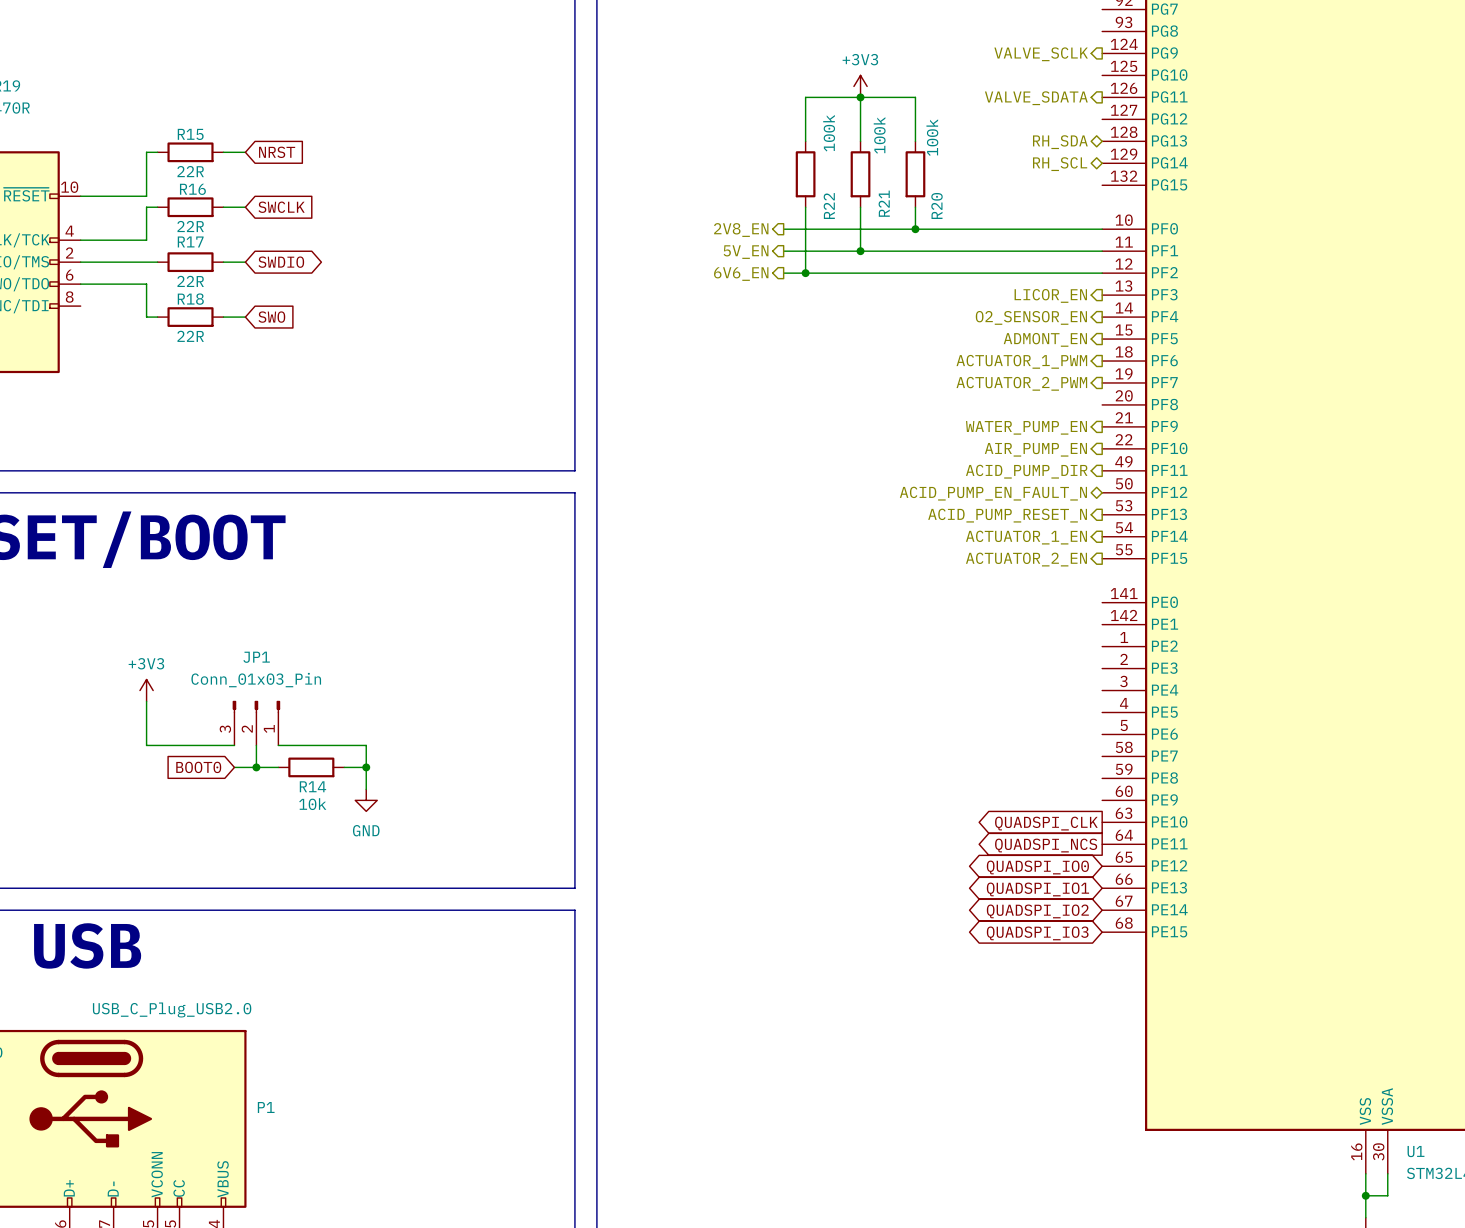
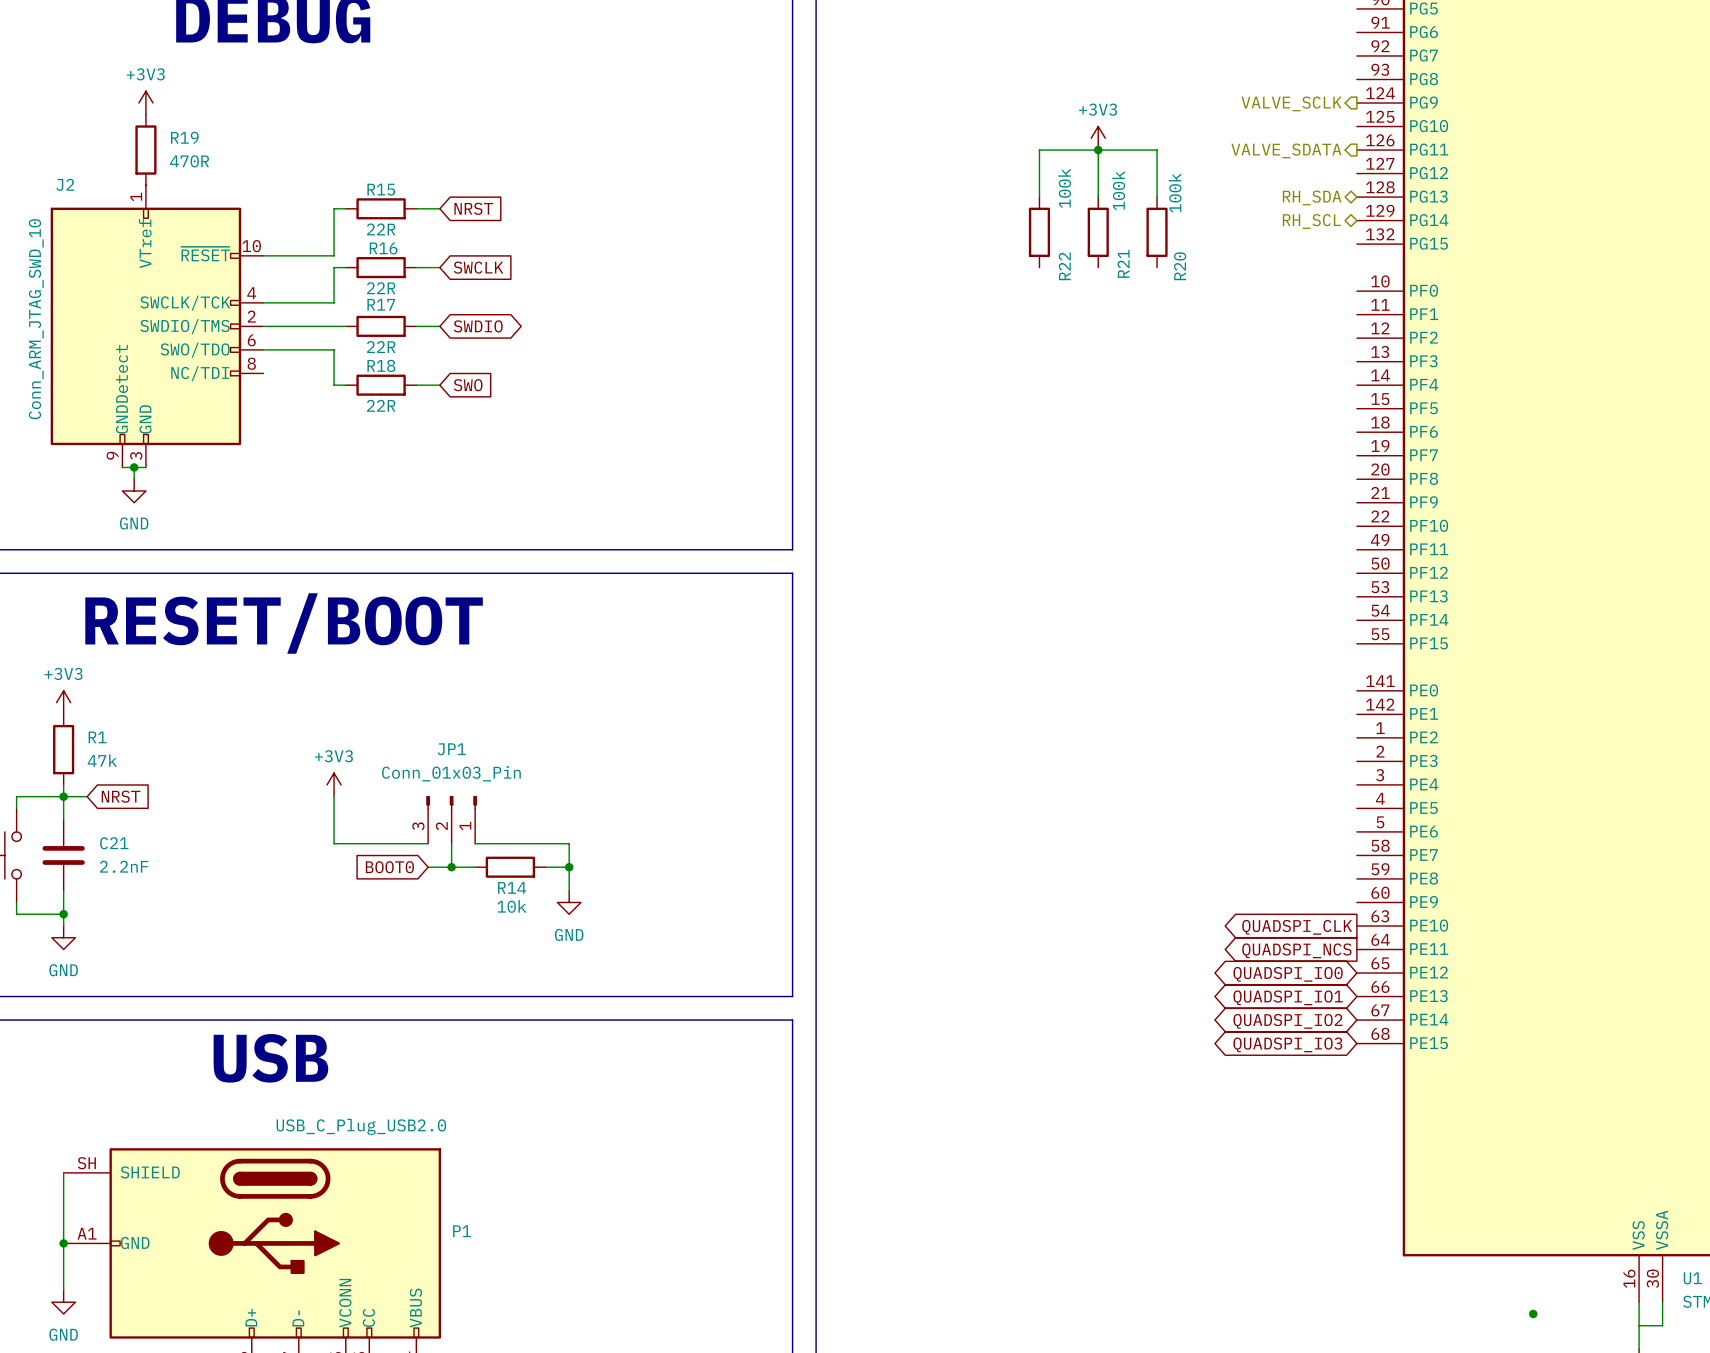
wire: (805, 207) (805, 273) -> none
wire: (860, 207) (860, 251) -> none
wire: (915, 207) (915, 229) -> none
wire: (783, 229) (1102, 229) -> none
junction: (915, 229) -> none
hierarchical label: 2V8_EN (741, 230) -> none
wire: (783, 251) (1102, 251) -> none
junction: (860, 251) -> none
hierarchical label: 5V_EN (746, 252) -> none
wire: (783, 273) (1102, 273) -> none
junction: (805, 273) -> none
hierarchical label: 6V6_EN (741, 274) -> none
hierarchical label: LICOR_EN (1050, 295) -> none
hierarchical label: O2_SENSOR_EN (1031, 317) -> none
hierarchical label: ADMONT_EN (1045, 339) -> none
hierarchical label: ACTUATOR_1_PWM (1021, 361) -> none
hierarchical label: ACTUATOR_2_PWM (1021, 383) -> none
hierarchical label: WATER_PUMP_EN (1026, 427) -> none
hierarchical label: AIR_PUMP_EN (1035, 449) -> none
hierarchical label: ACID_PUMP_DIR (1026, 471) -> none
hierarchical label: ACID_PUMP_EN_FAULT_N (993, 493) -> none
hierarchical label: ACID_PUMP_RESET_N (1007, 515) -> none
hierarchical label: ACTUATOR_1_EN (1026, 537) -> none
hierarchical label: ACTUATOR_2_EN (1026, 559) -> none
junction: none -> (1533, 1313)
junction: (1365, 1195) -> none

